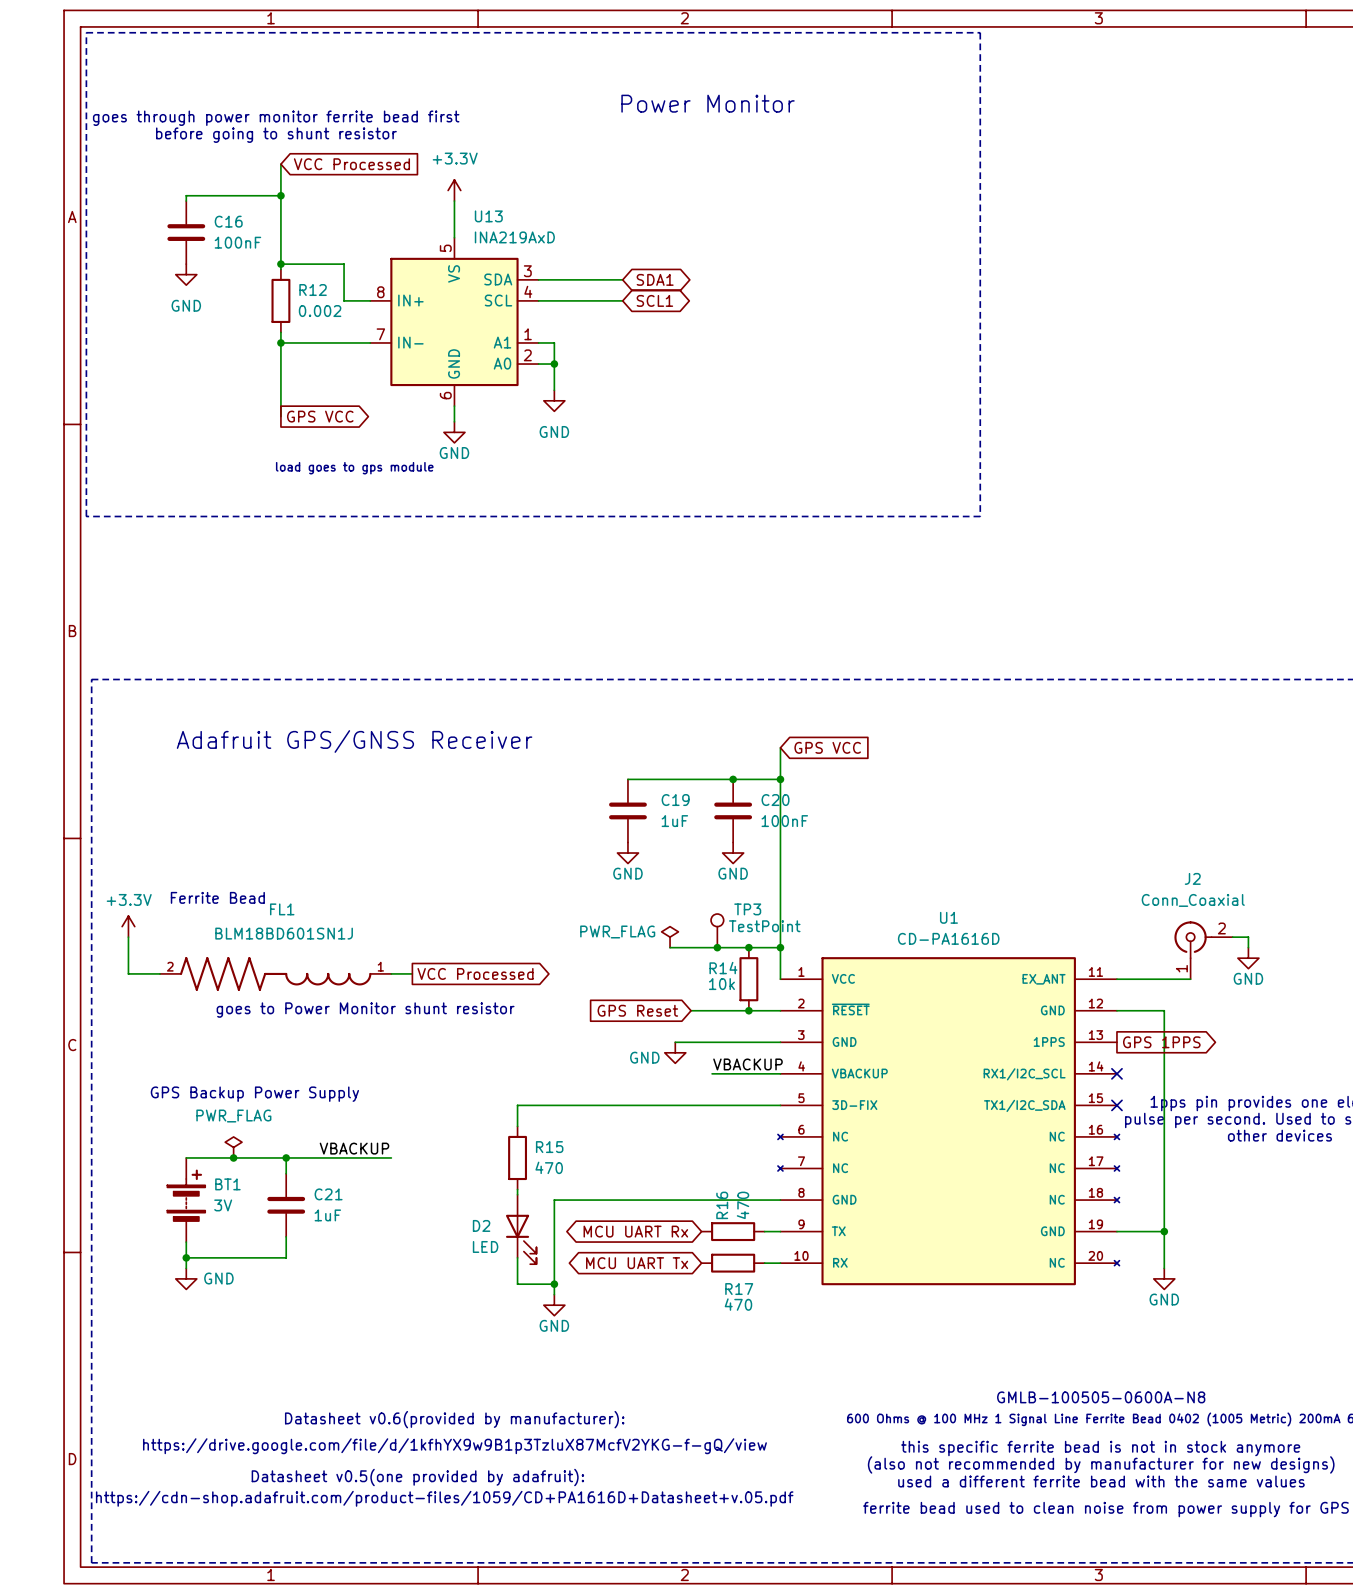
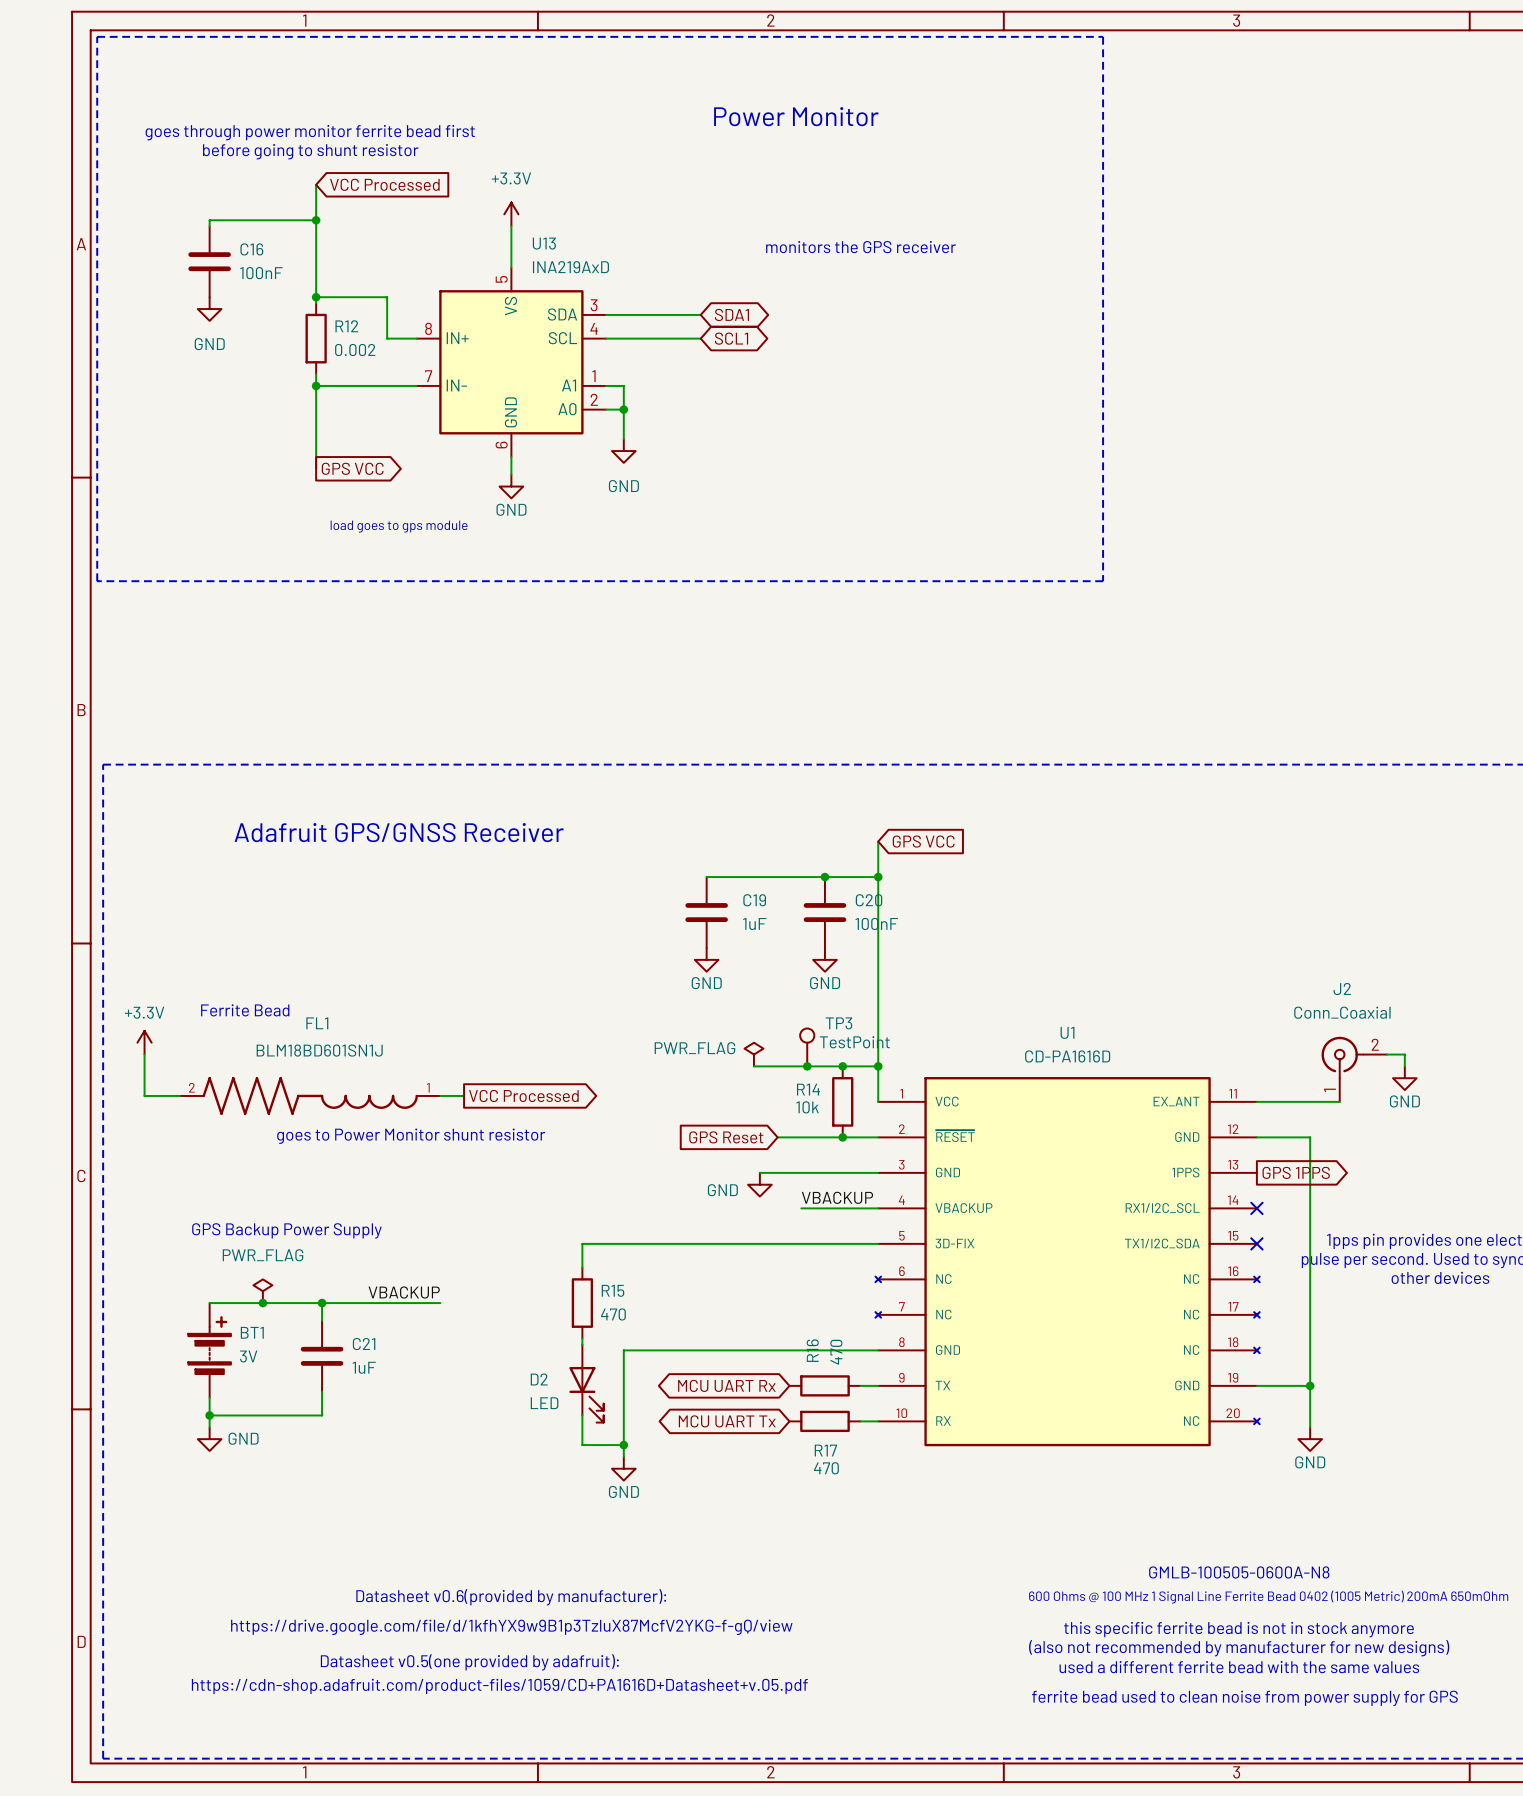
text: none -> monitors the GPS receiver (861, 247)

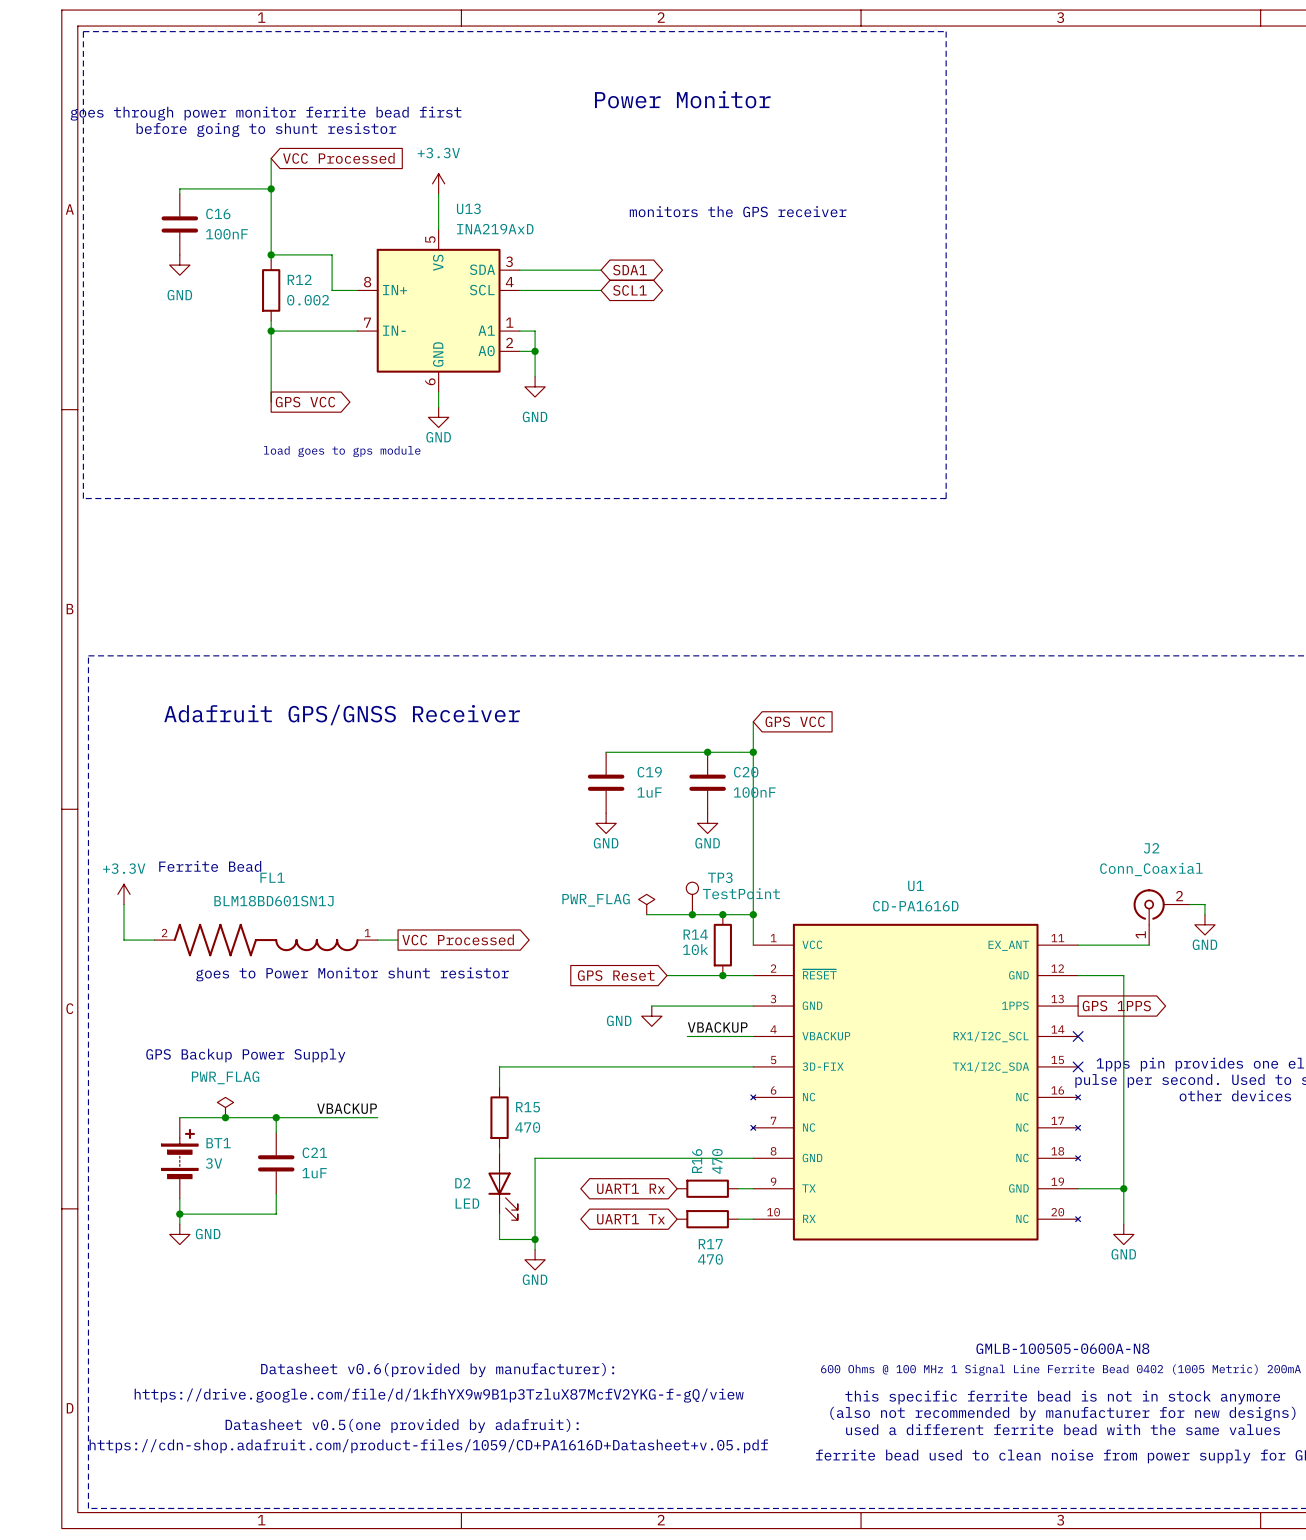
global label: MCU UART Rx (726, 1385) -> UART1 Rx (630, 1188)
global label: MCU UART Tx (727, 1421) -> UART1 Tx (630, 1219)

